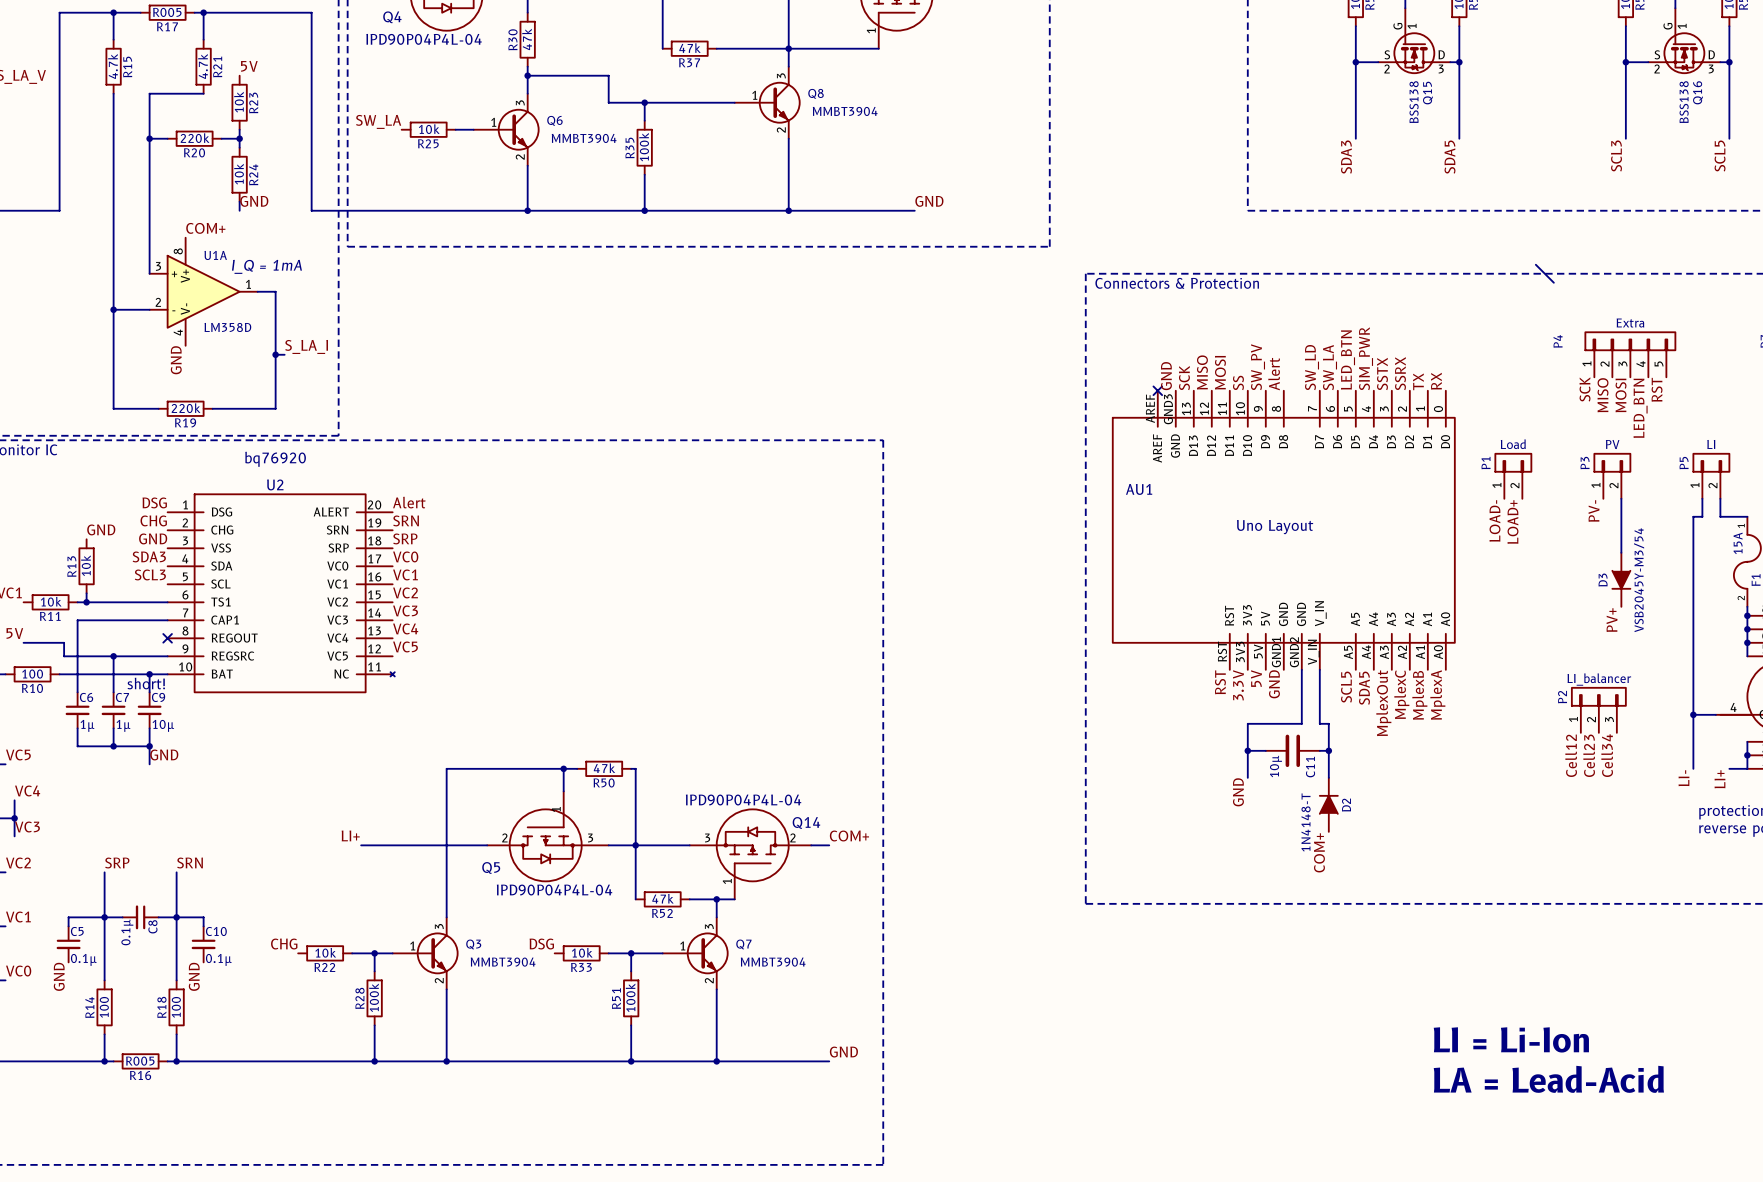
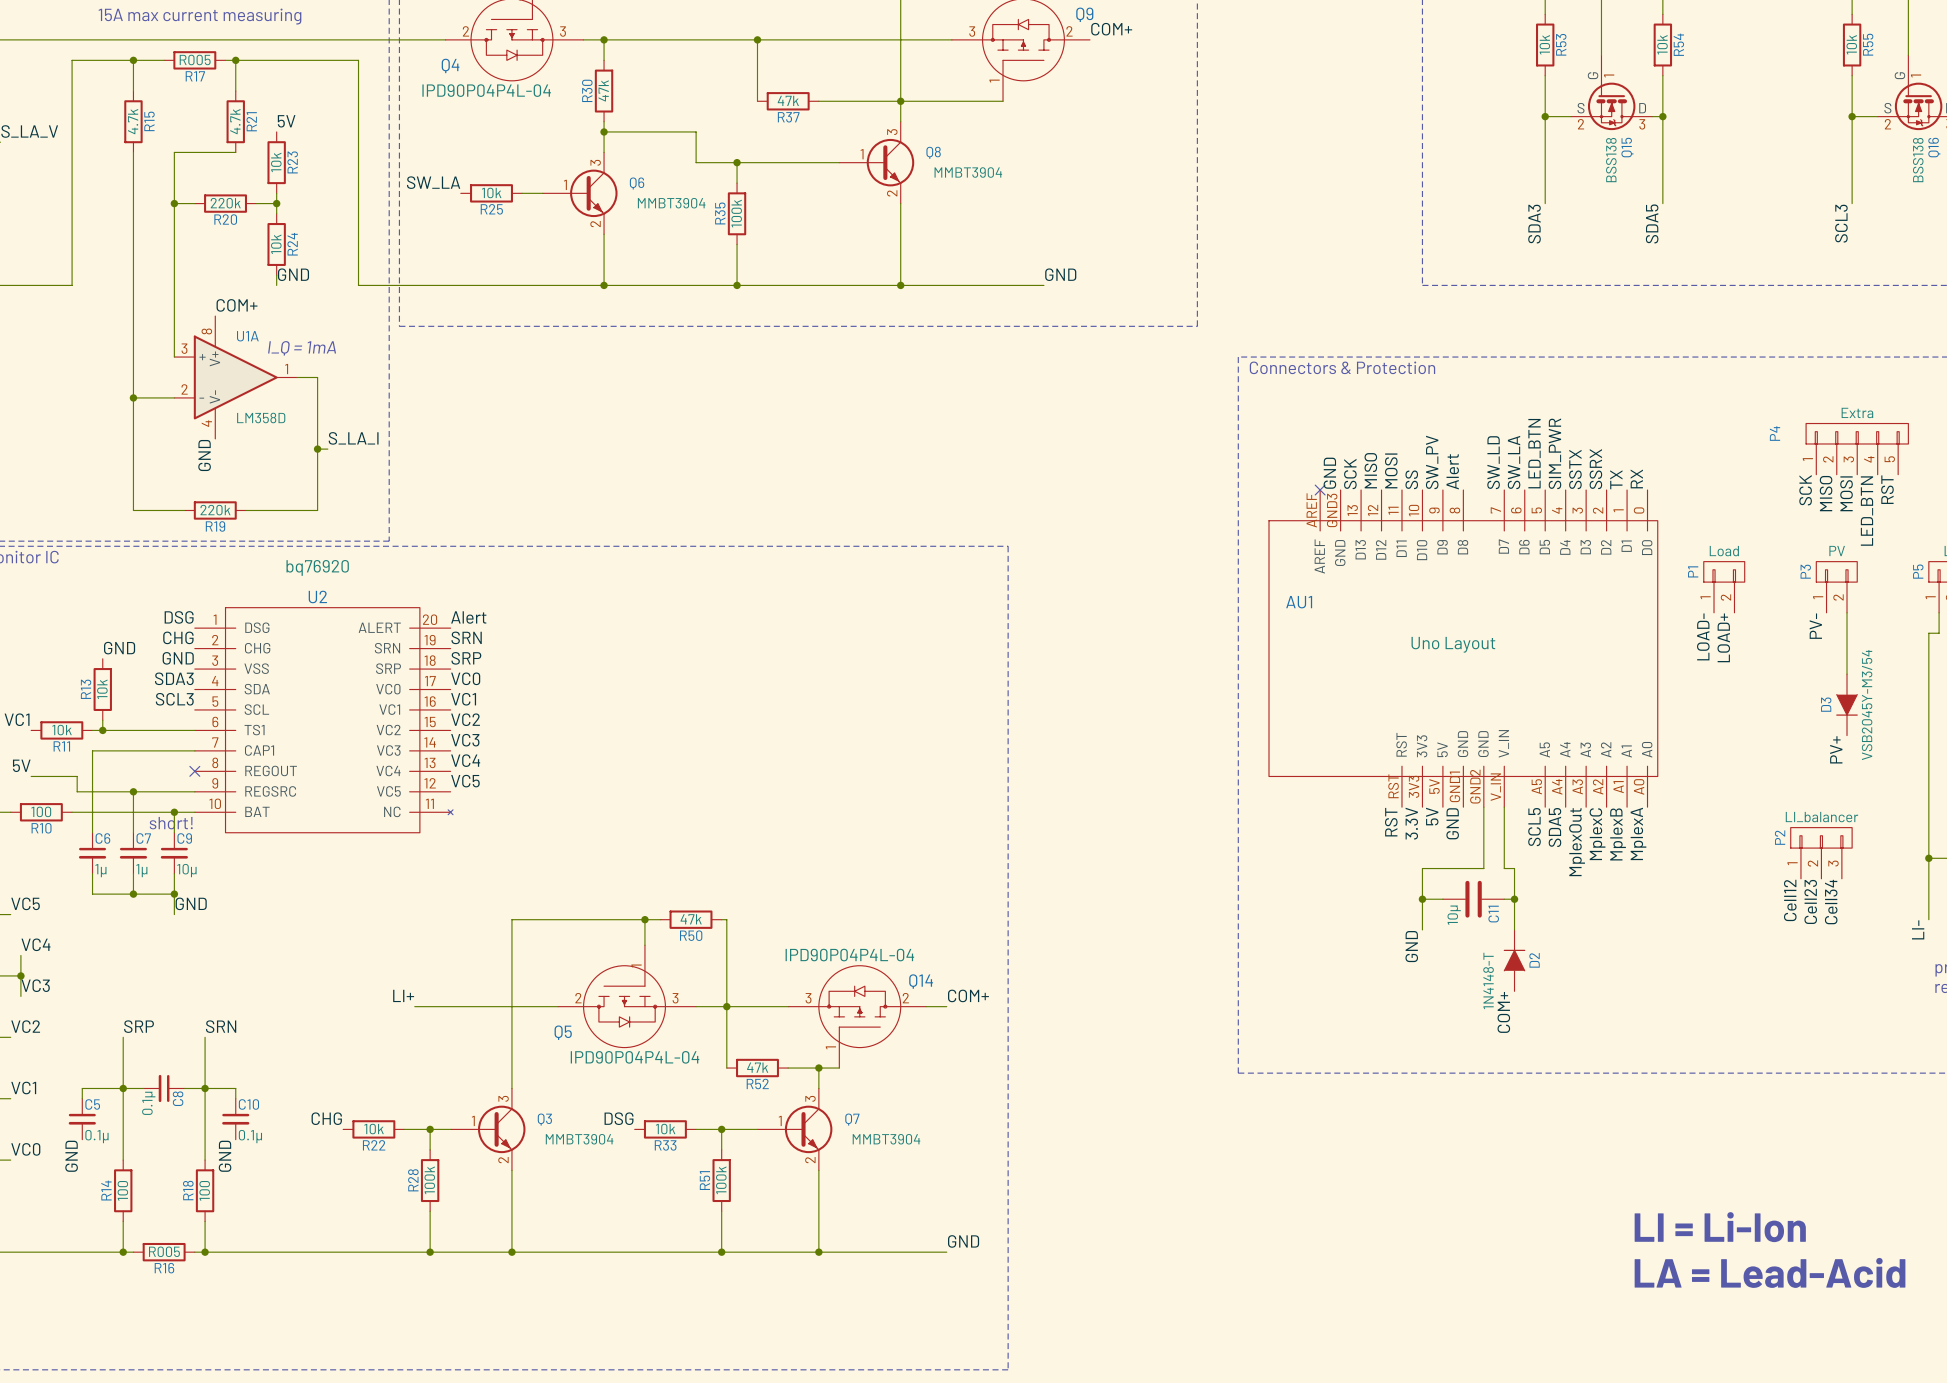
wire: (1535, 264) (1553, 282) -> none

